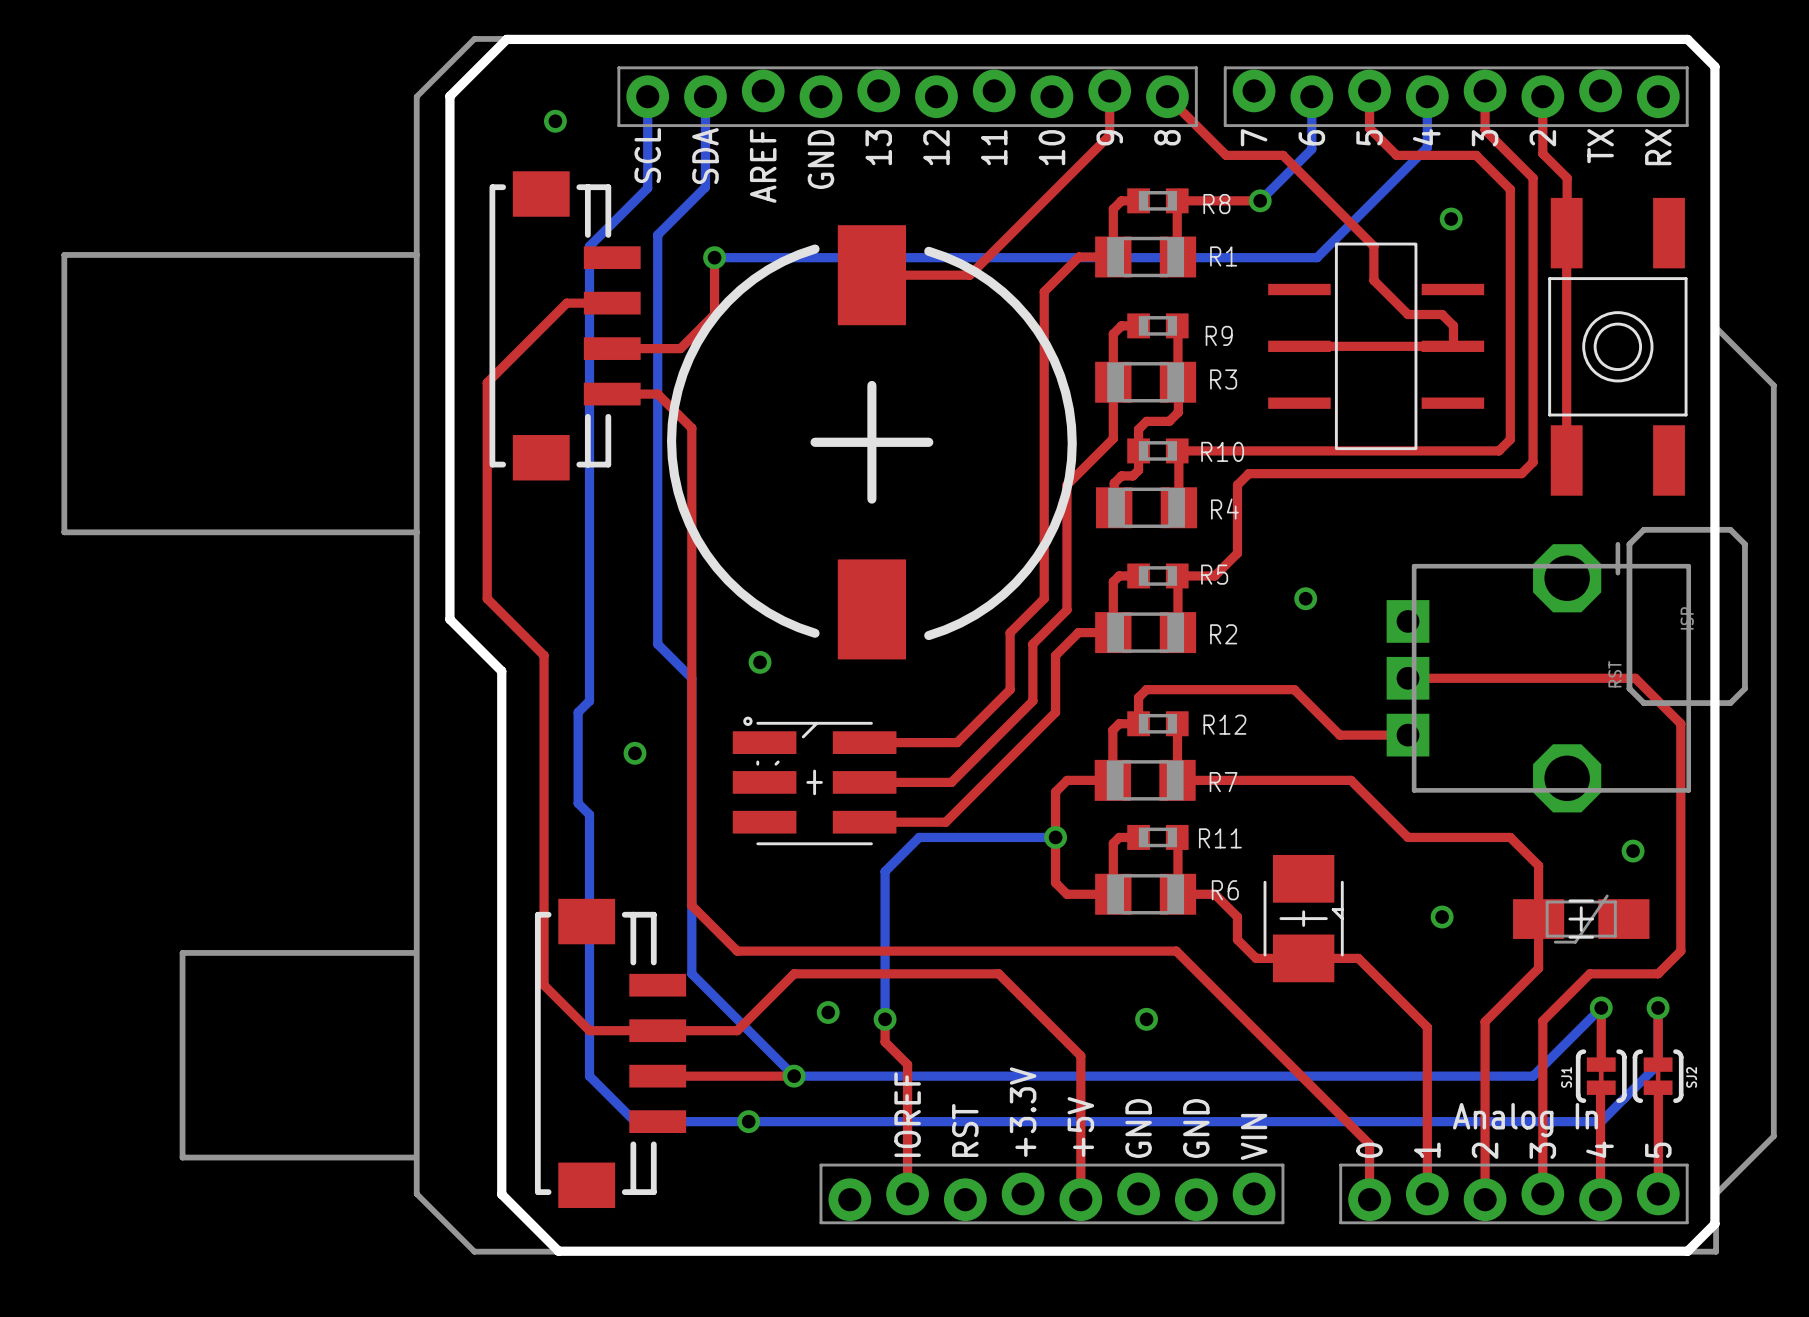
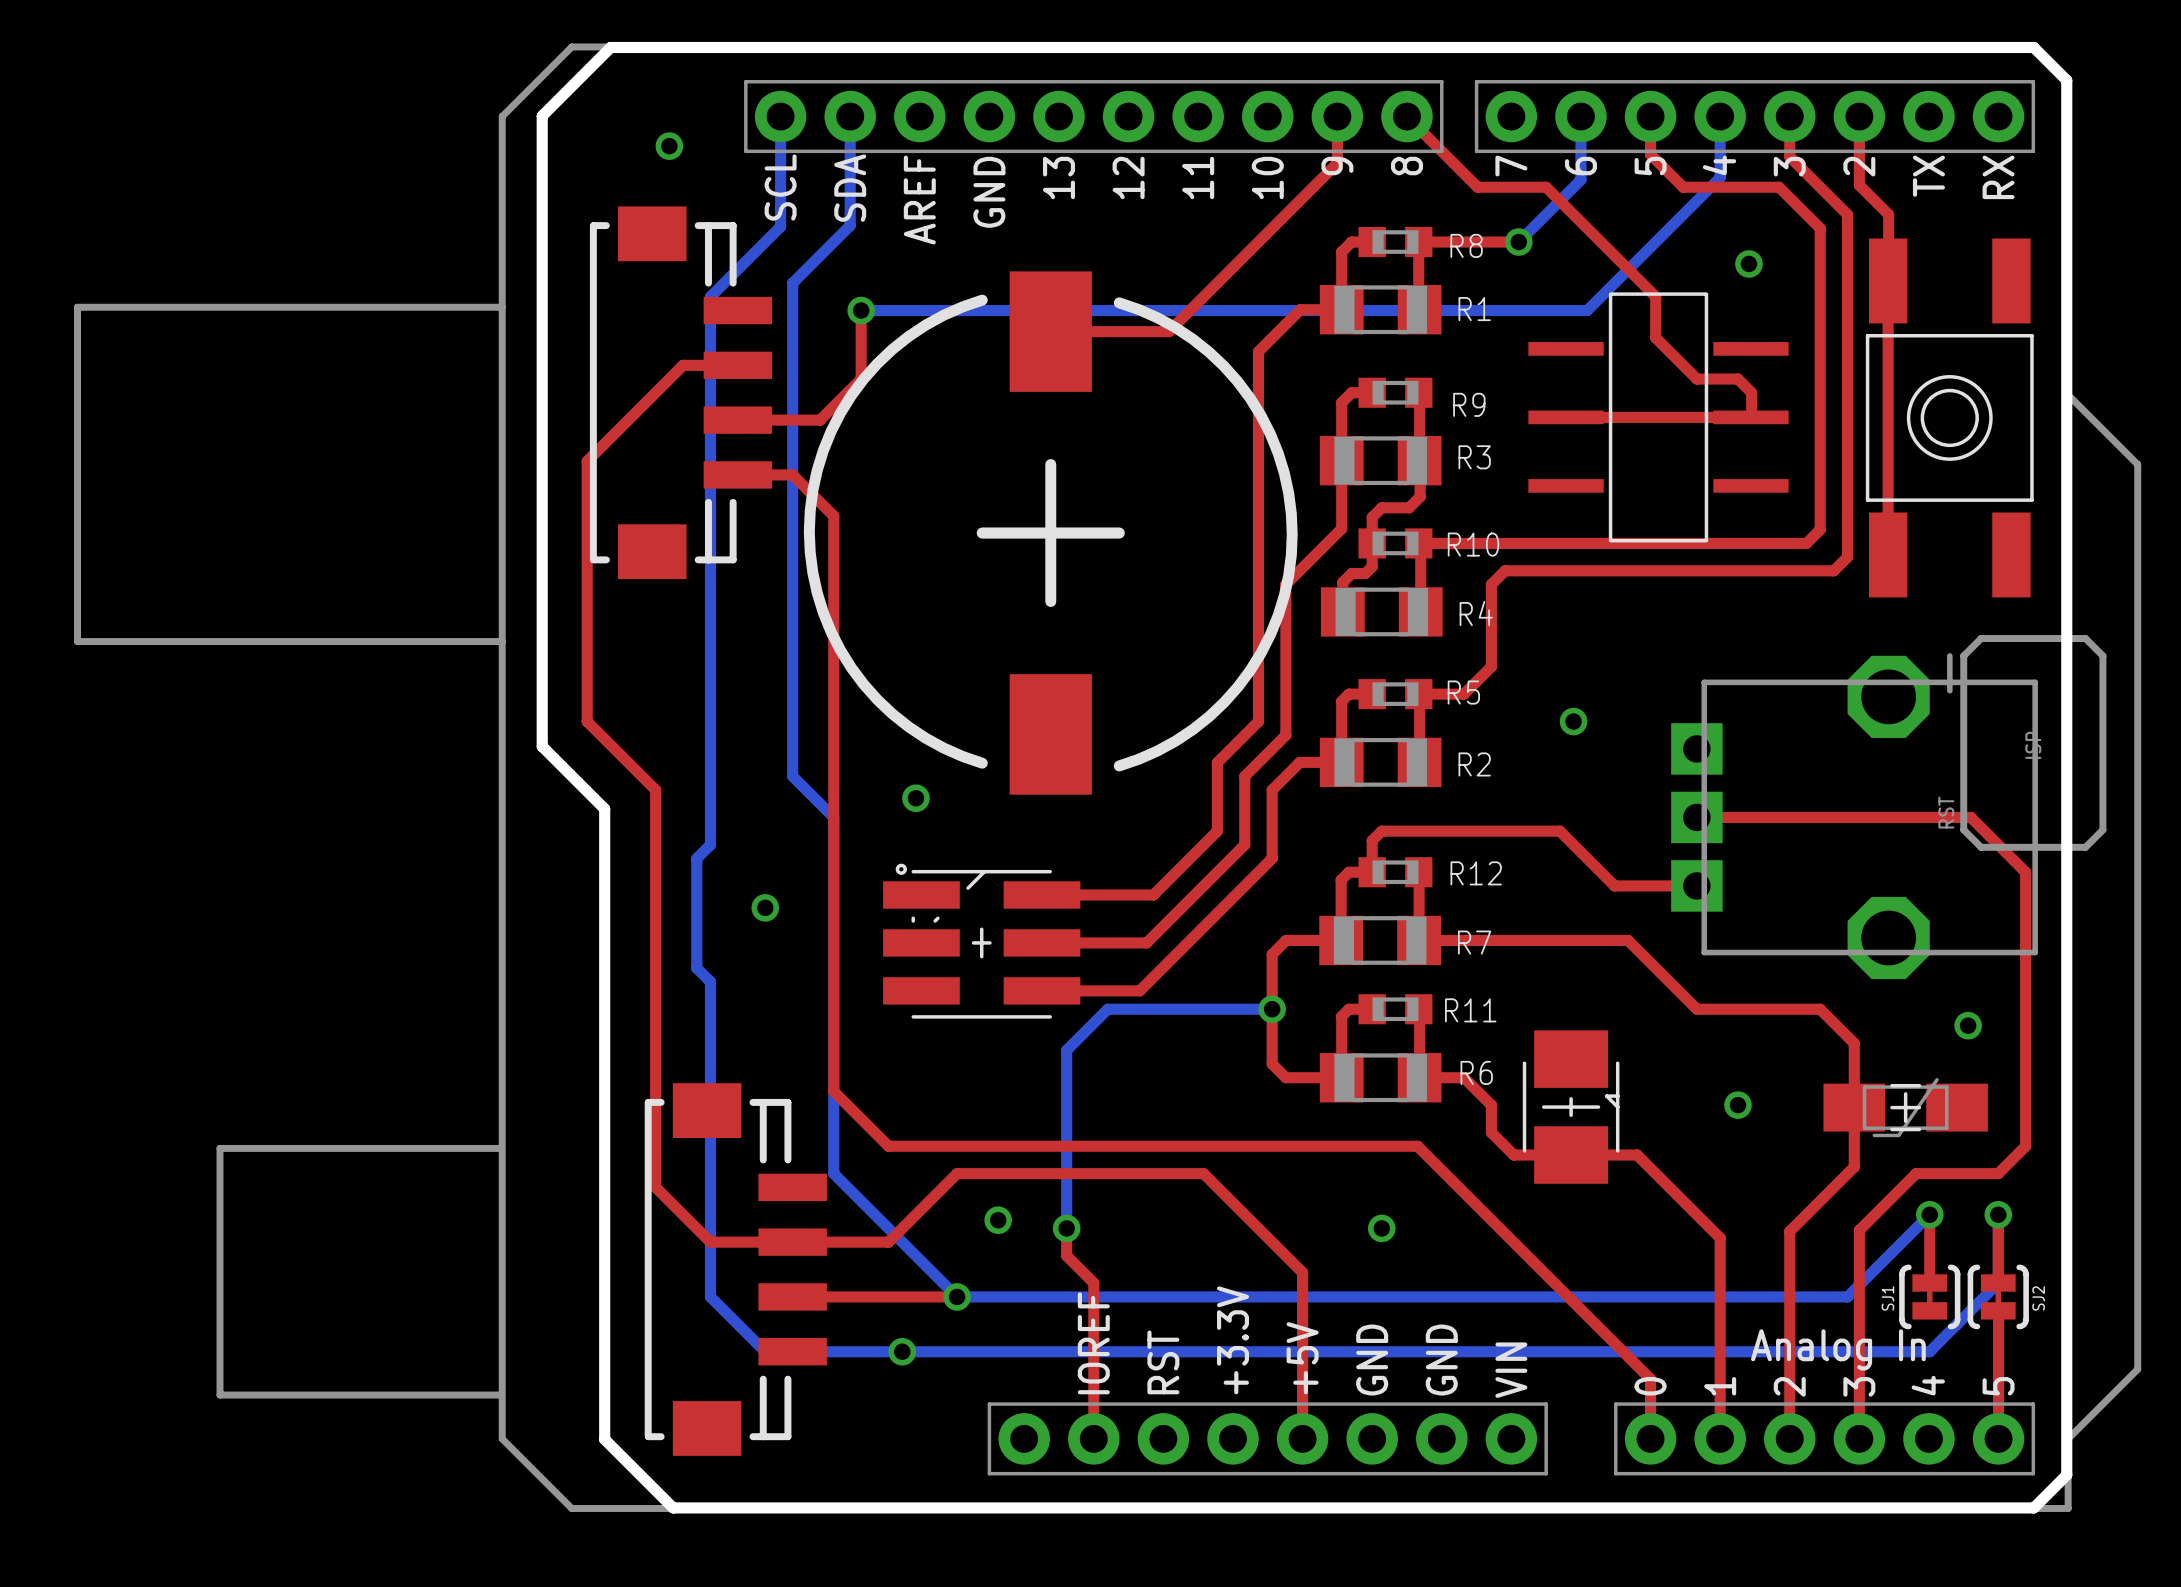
part footprint: [61, 36, 1777, 1255] -> [74, 43, 2142, 1512]
top track: (1600, 1088) (1600, 1199) -> none

